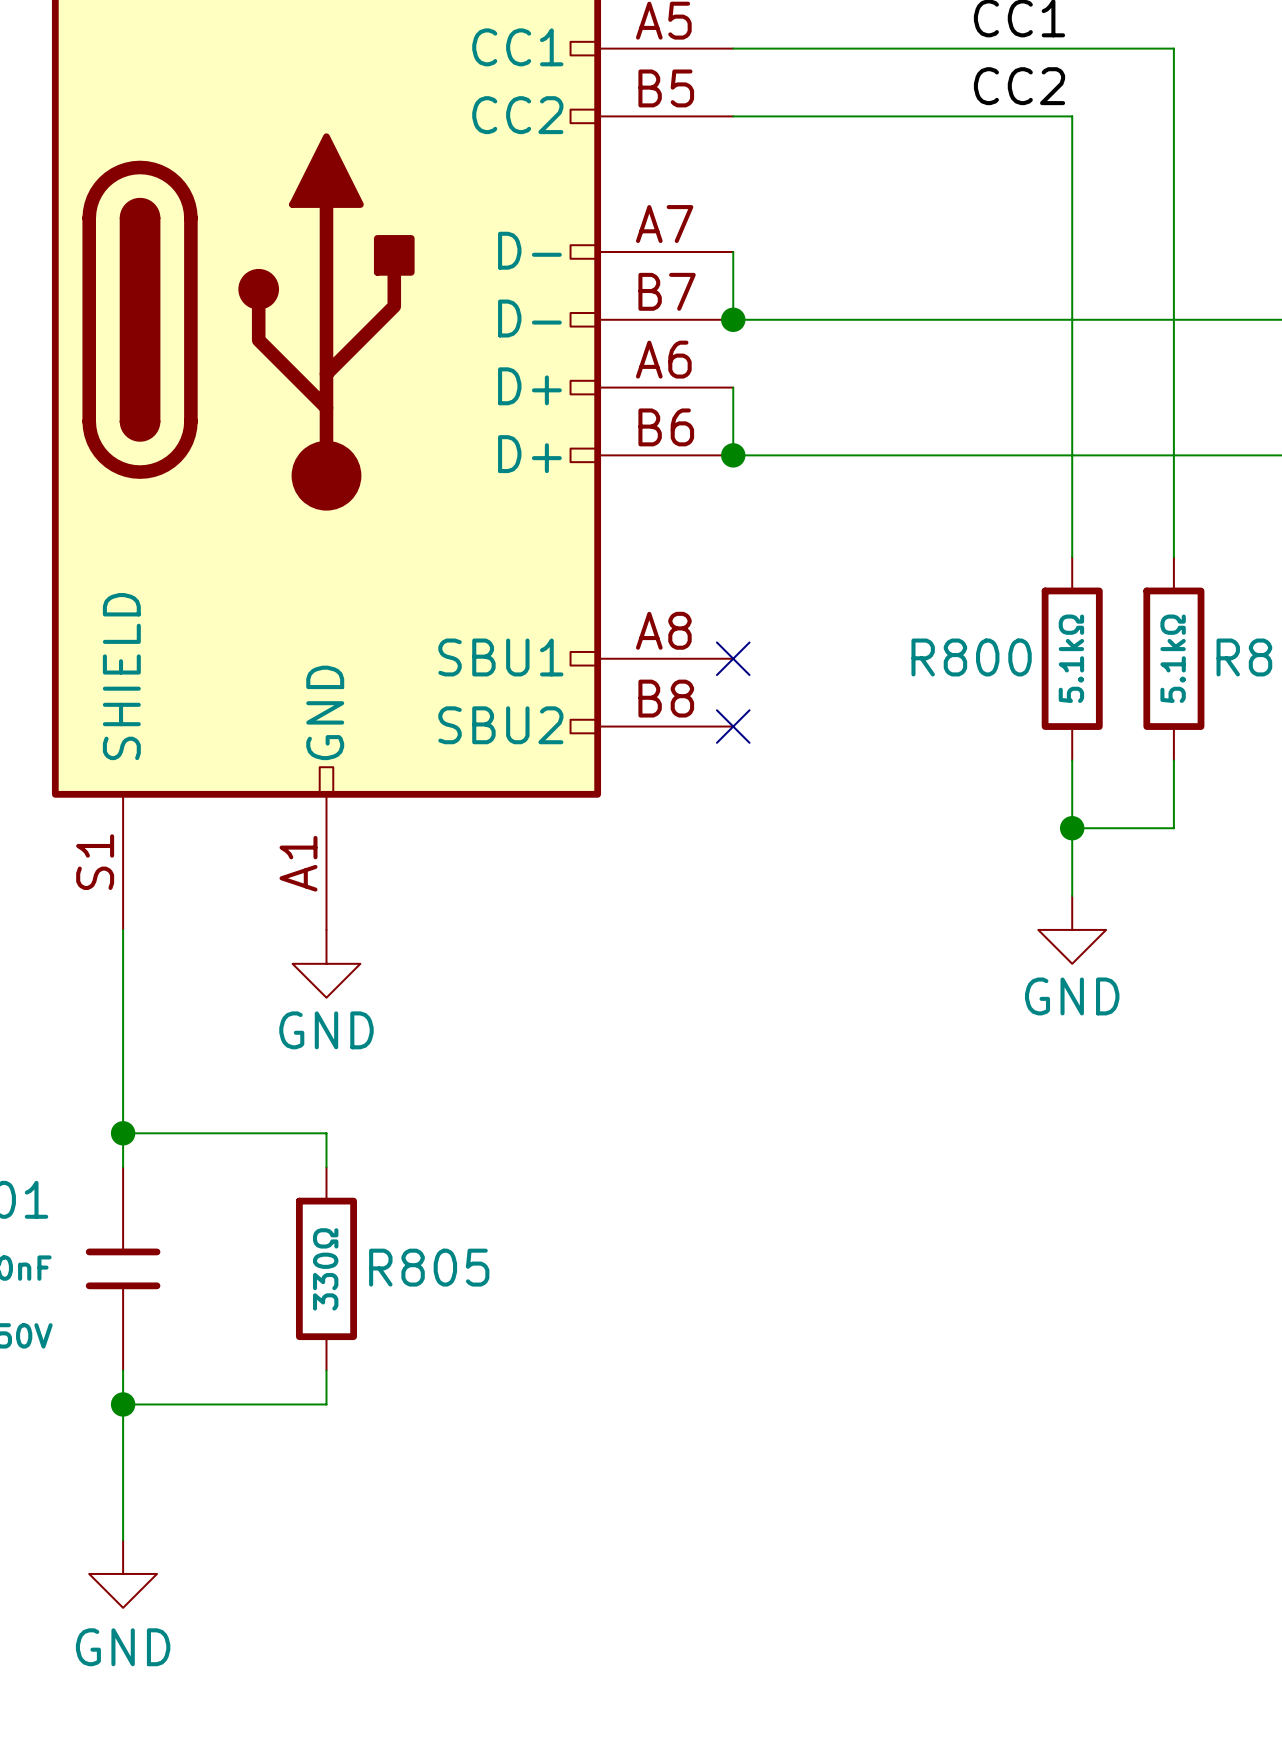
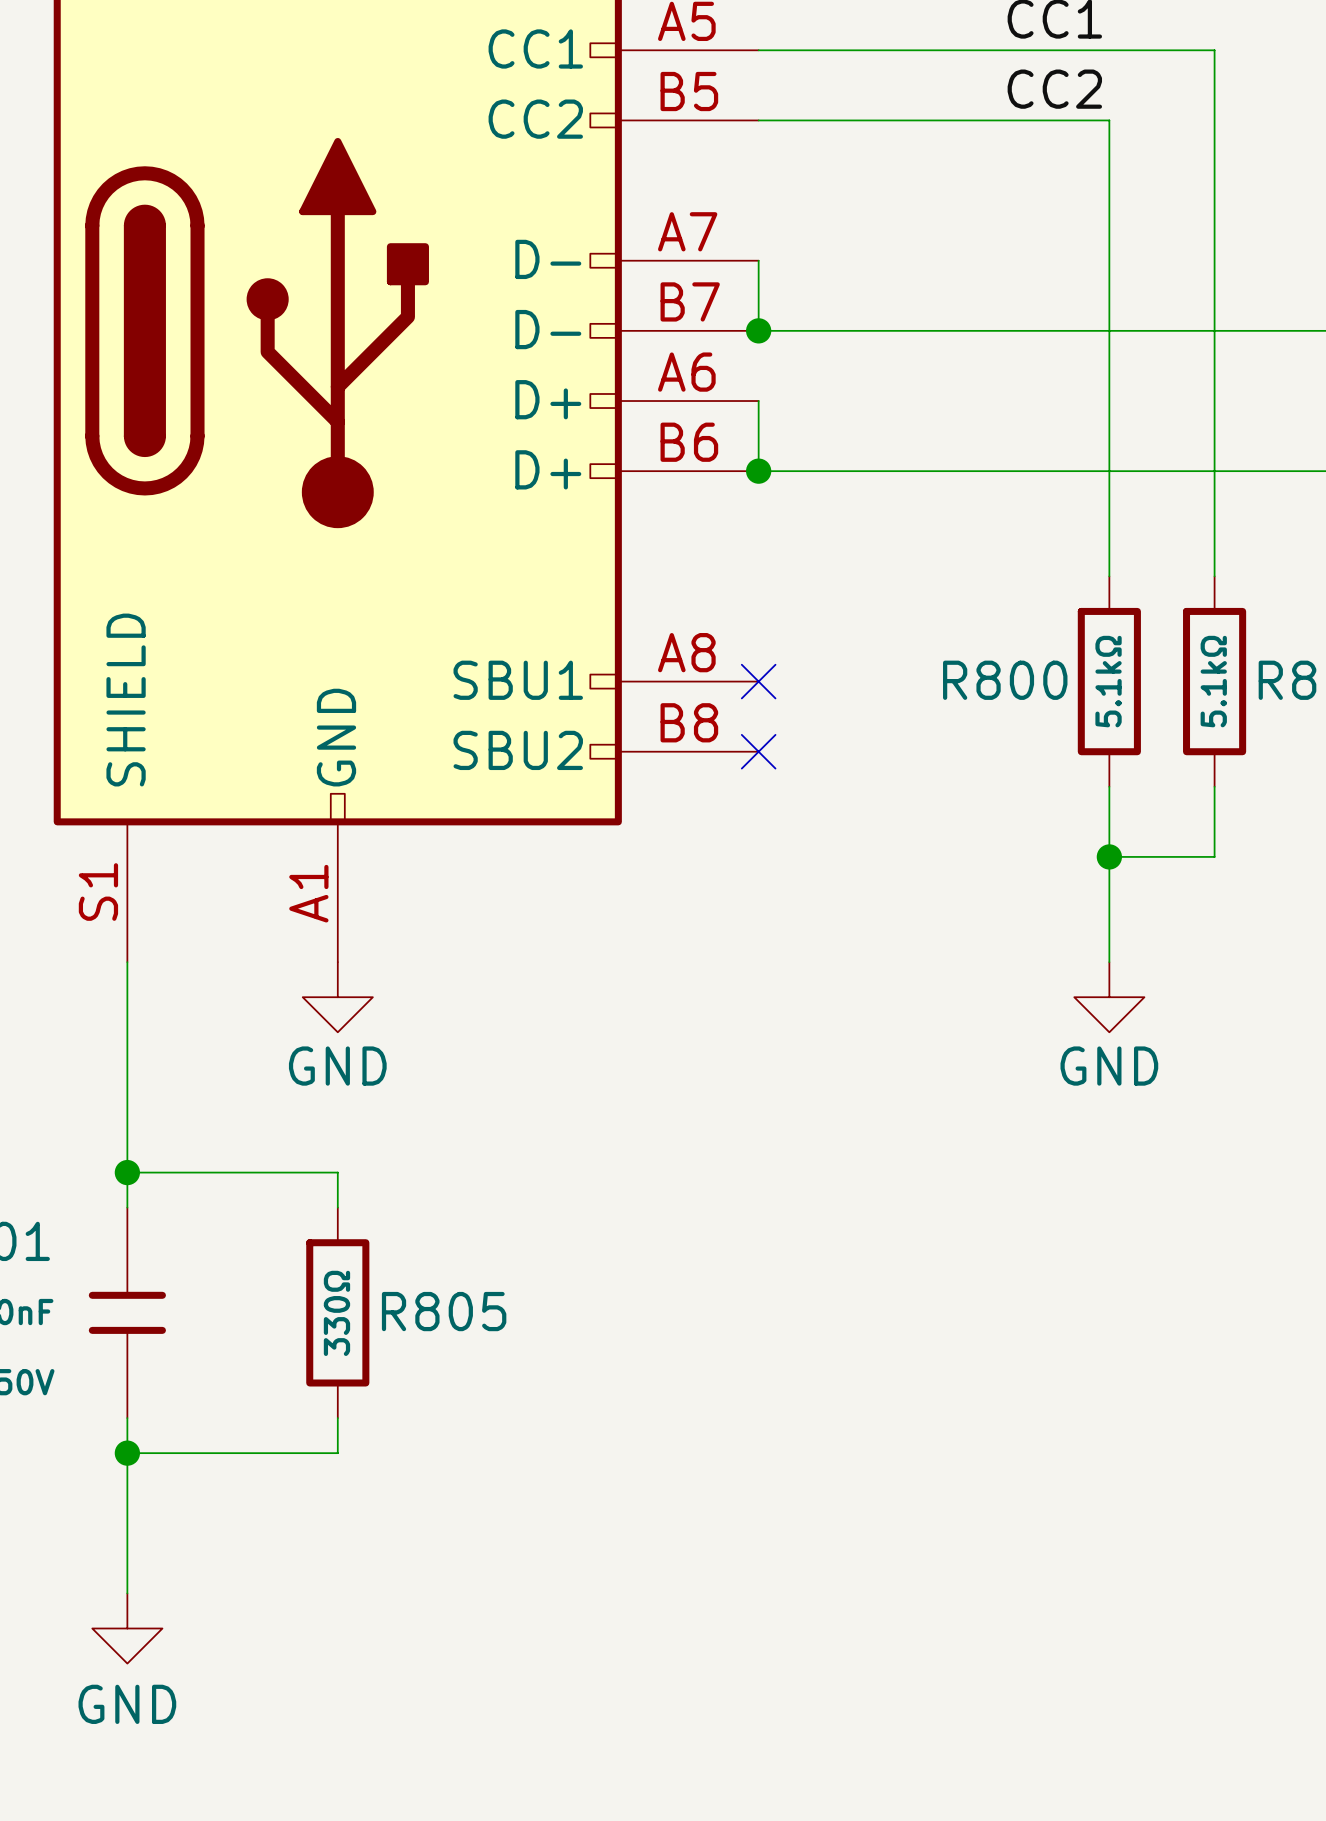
power symbol position: GND (1072, 929) -> GND (1109, 997)

